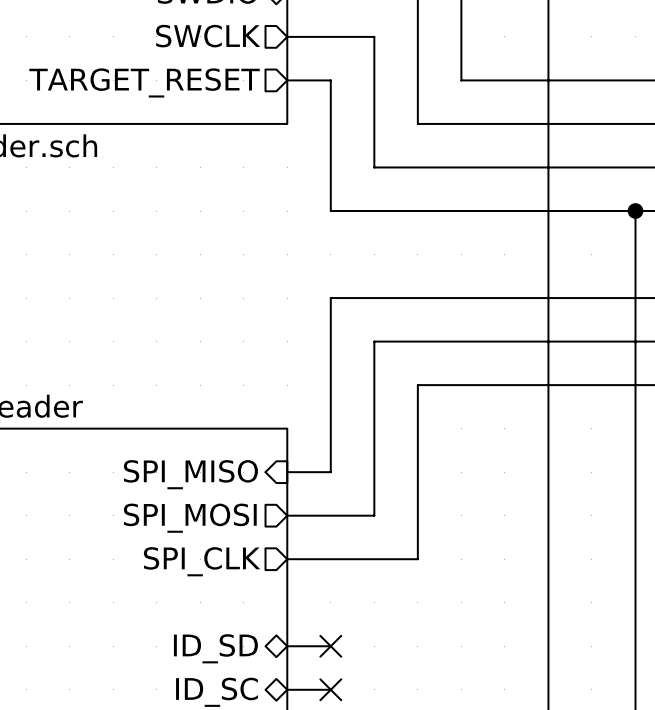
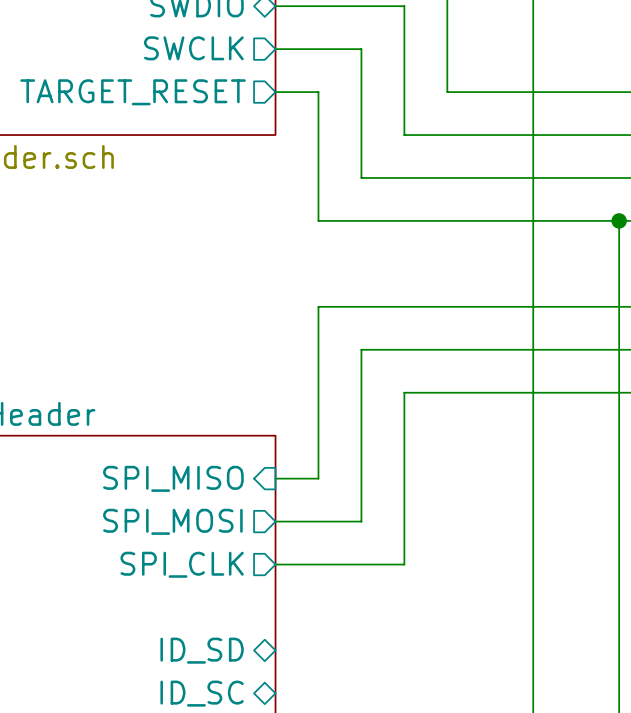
wire: (287, 646) (330, 646) -> none
no-connect mark: (330, 646) -> none
wire: (287, 689) (330, 689) -> none
no-connect mark: (330, 689) -> none

